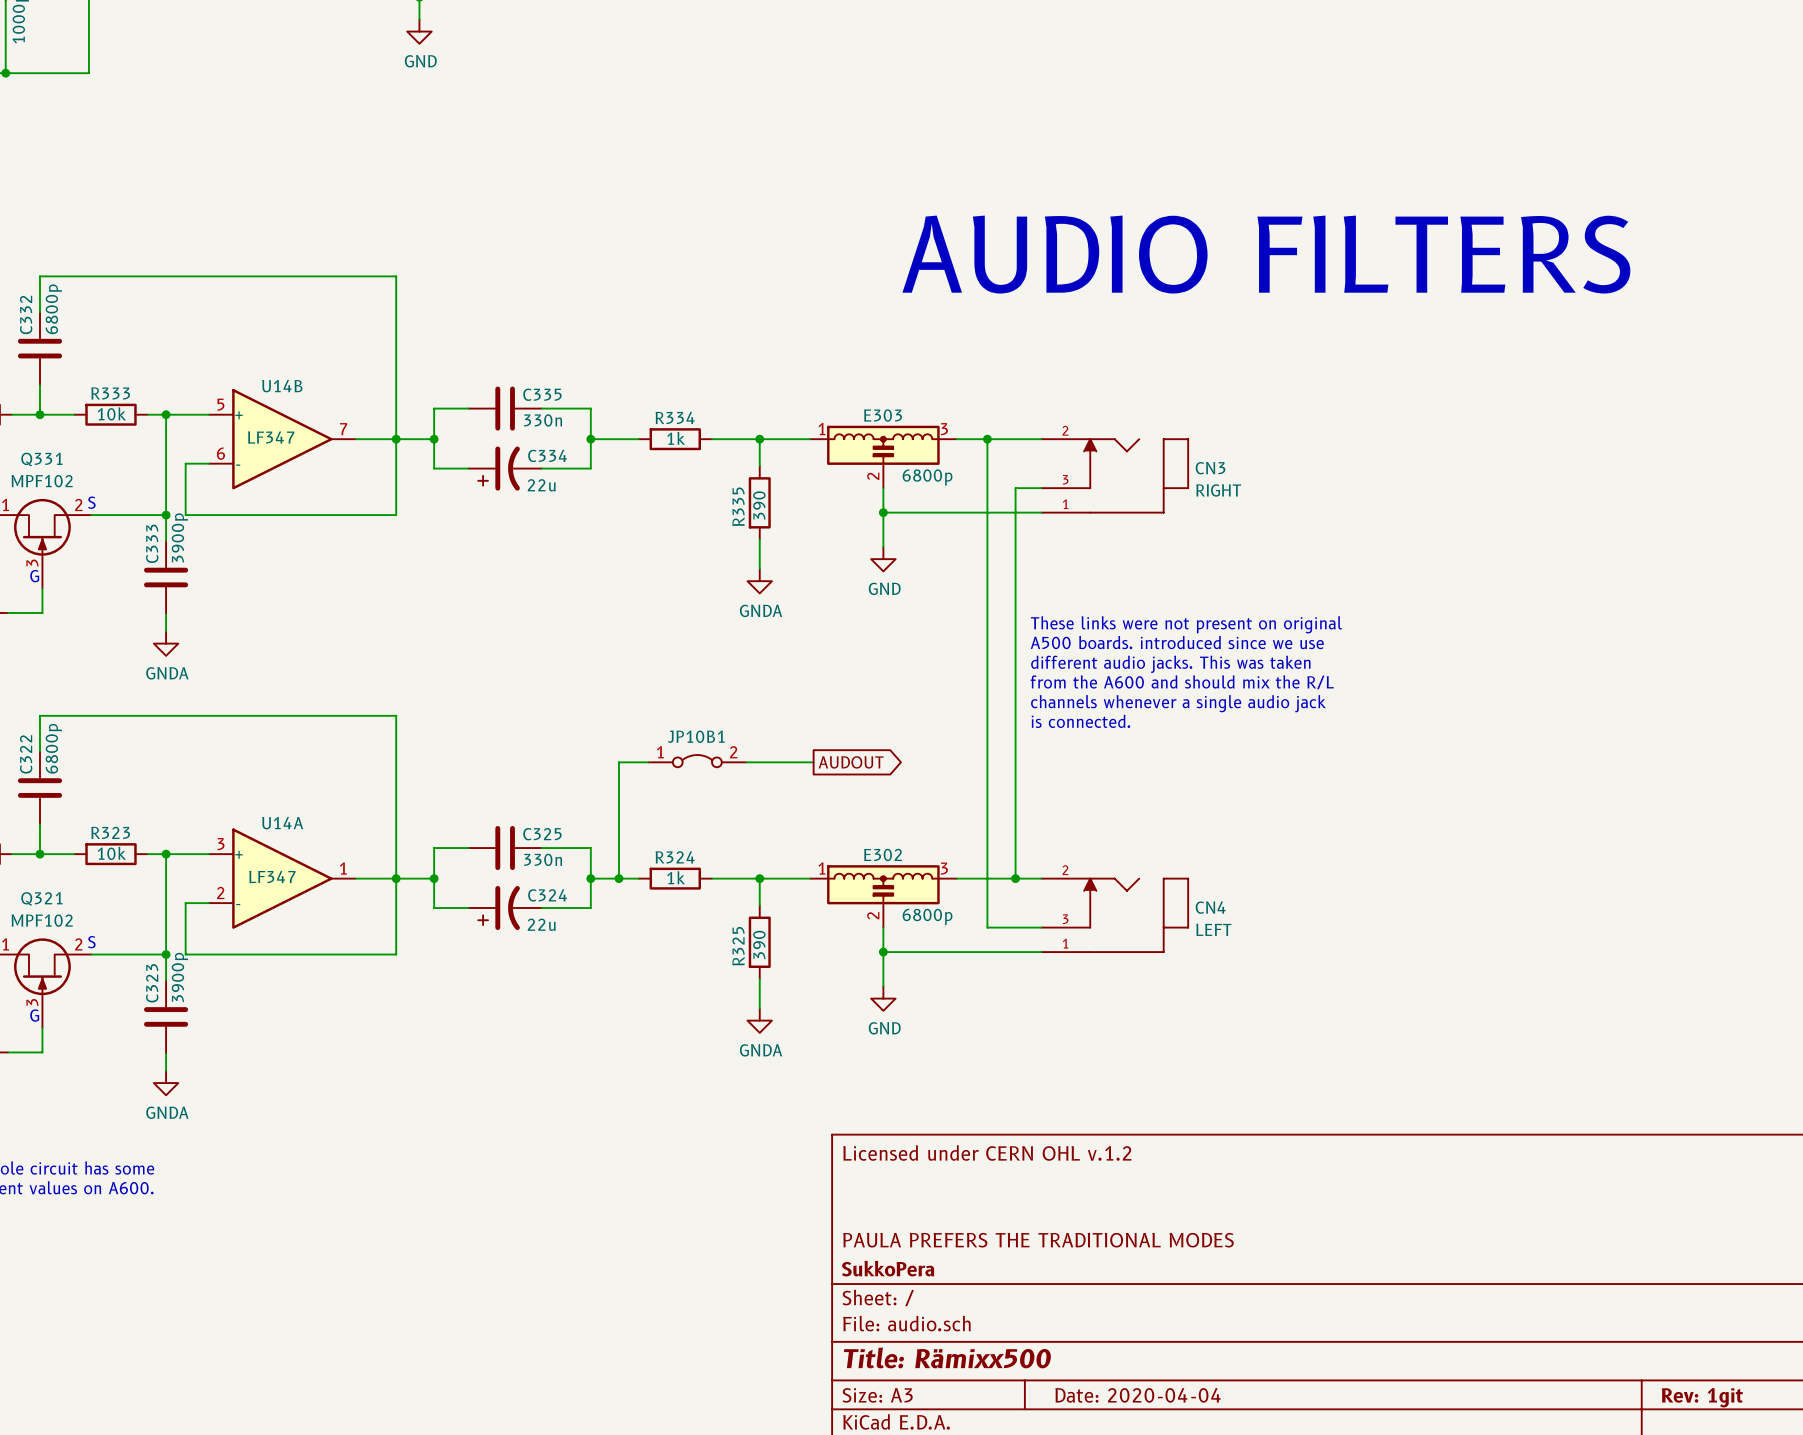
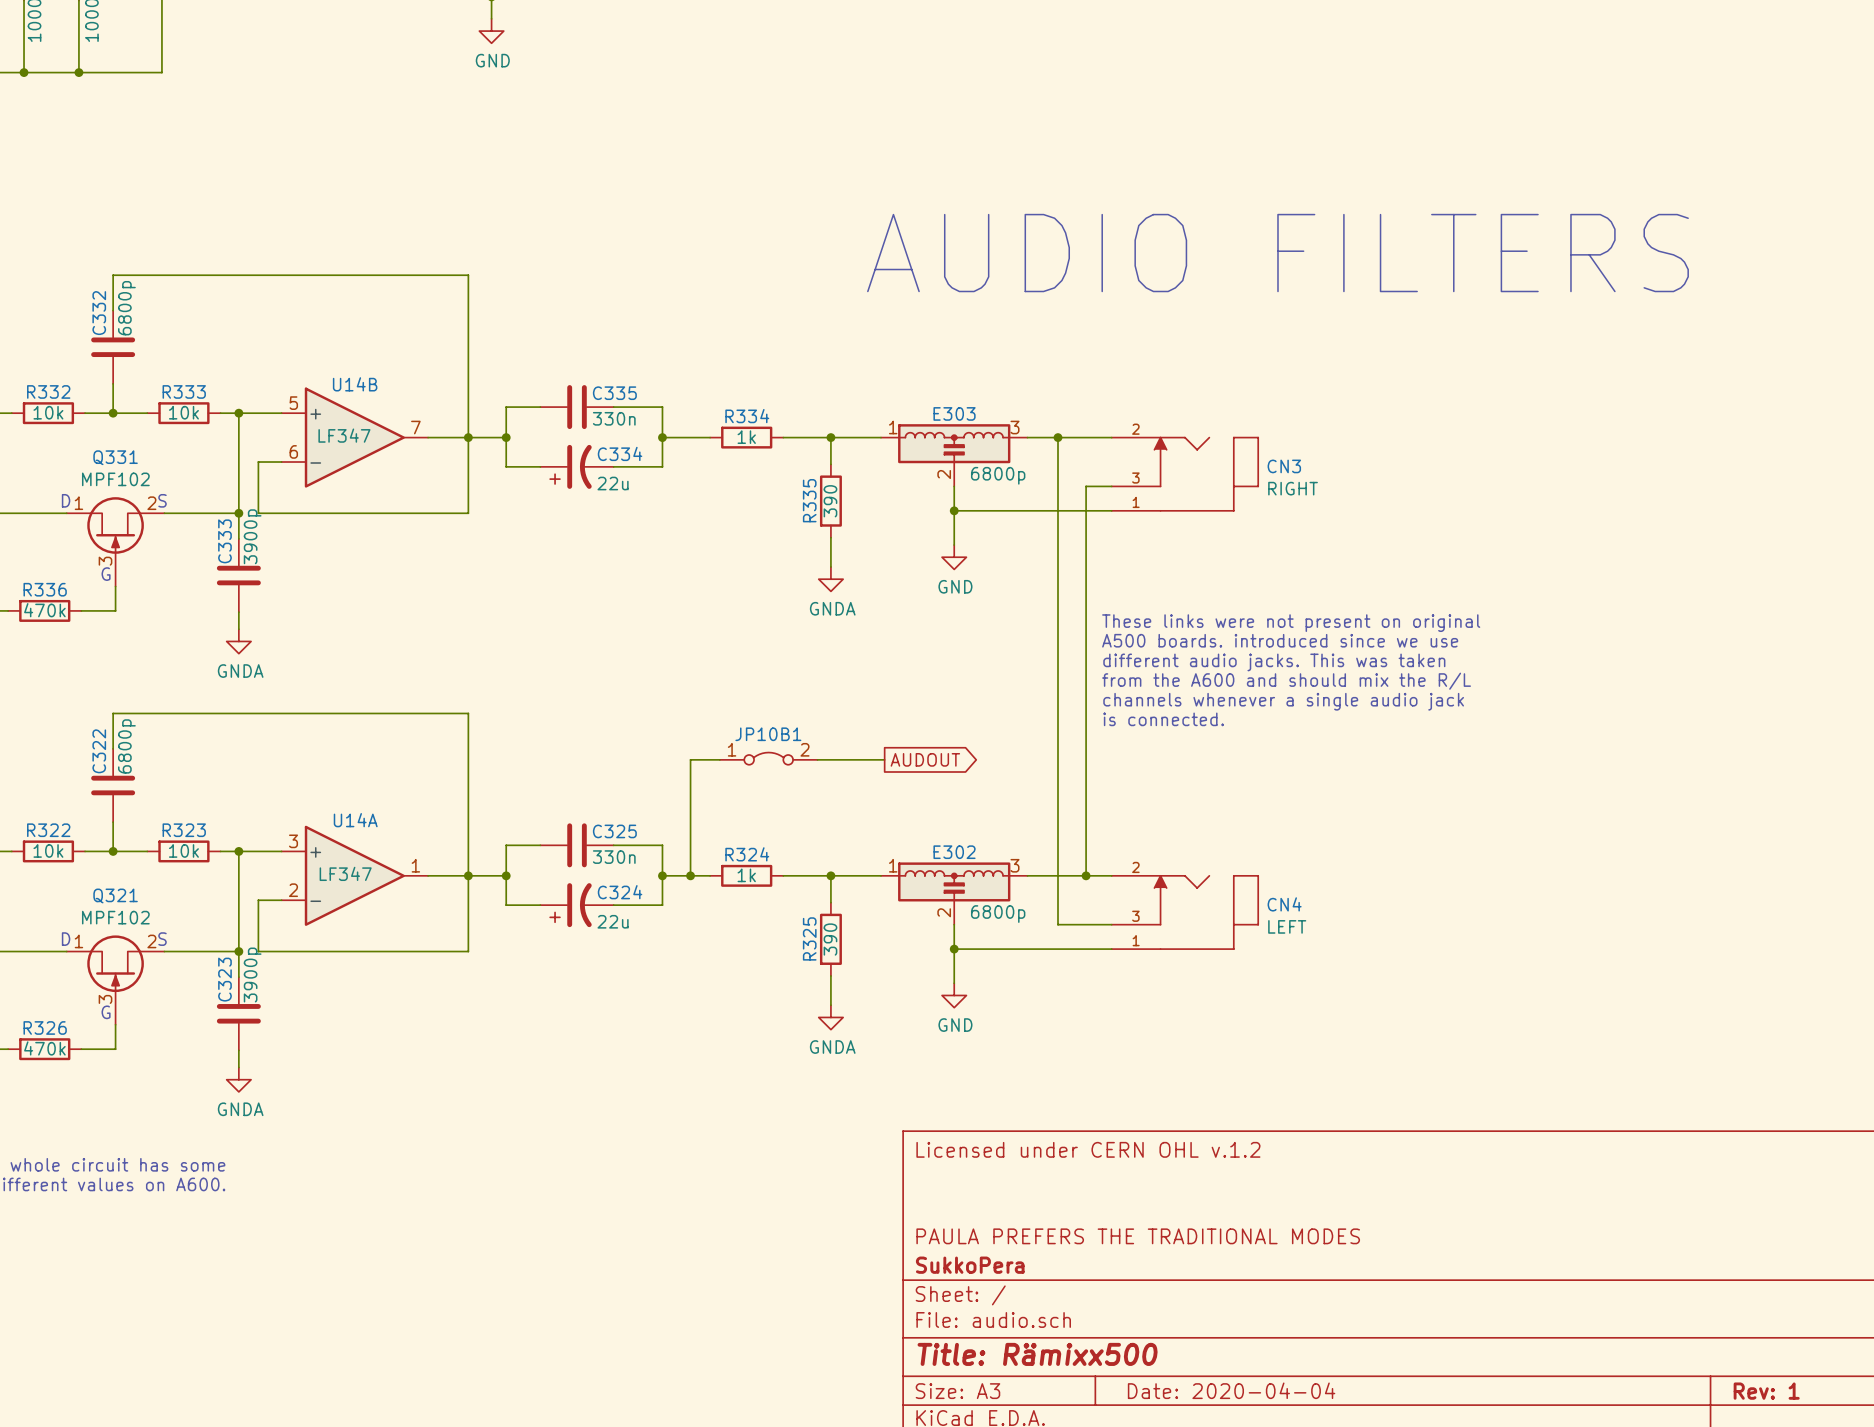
title block: Rev: 1git (1702, 1397) -> Rev: 1 (1766, 1391)

